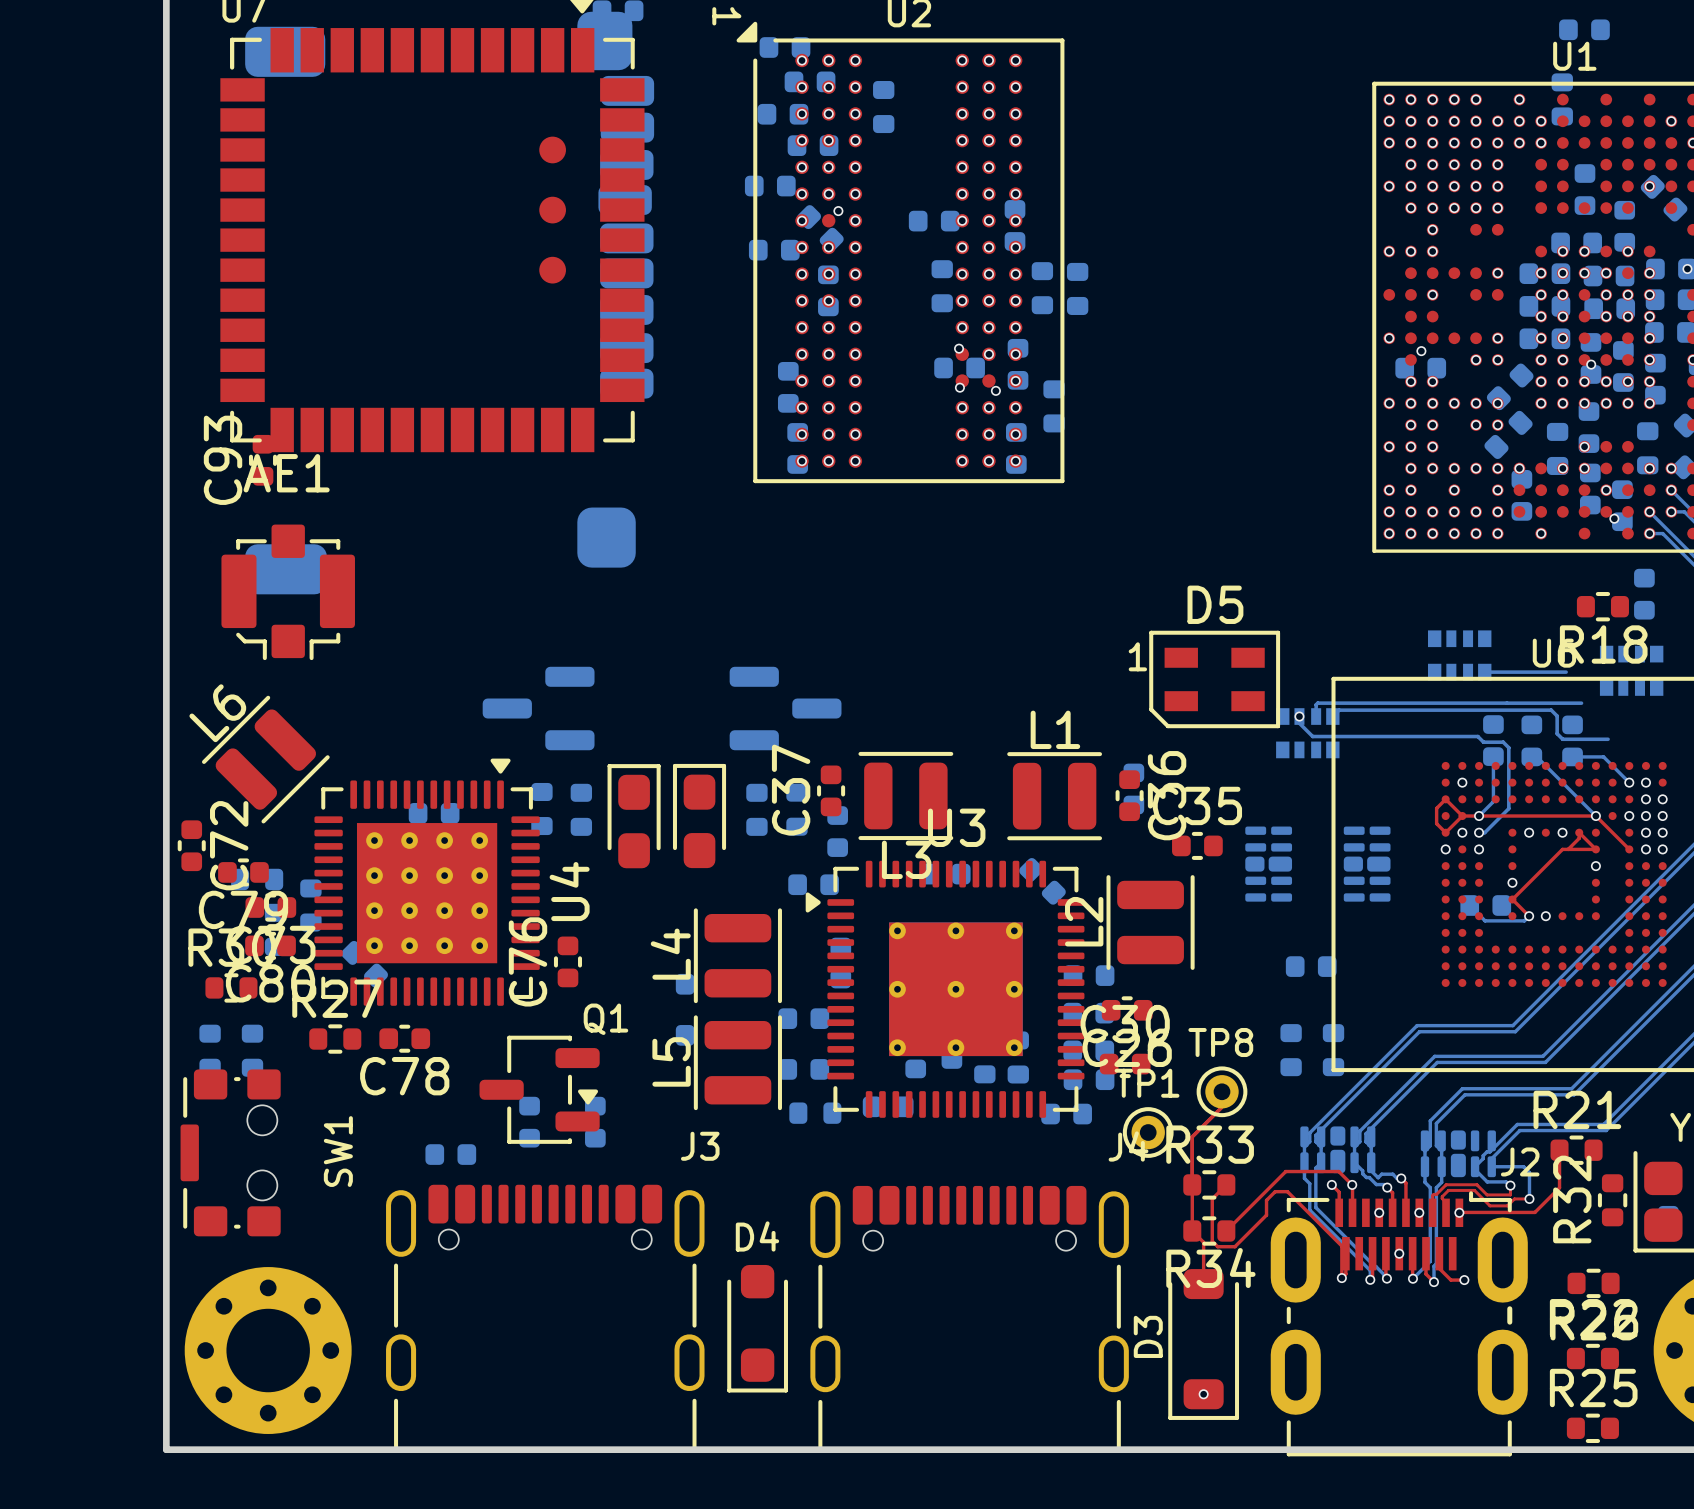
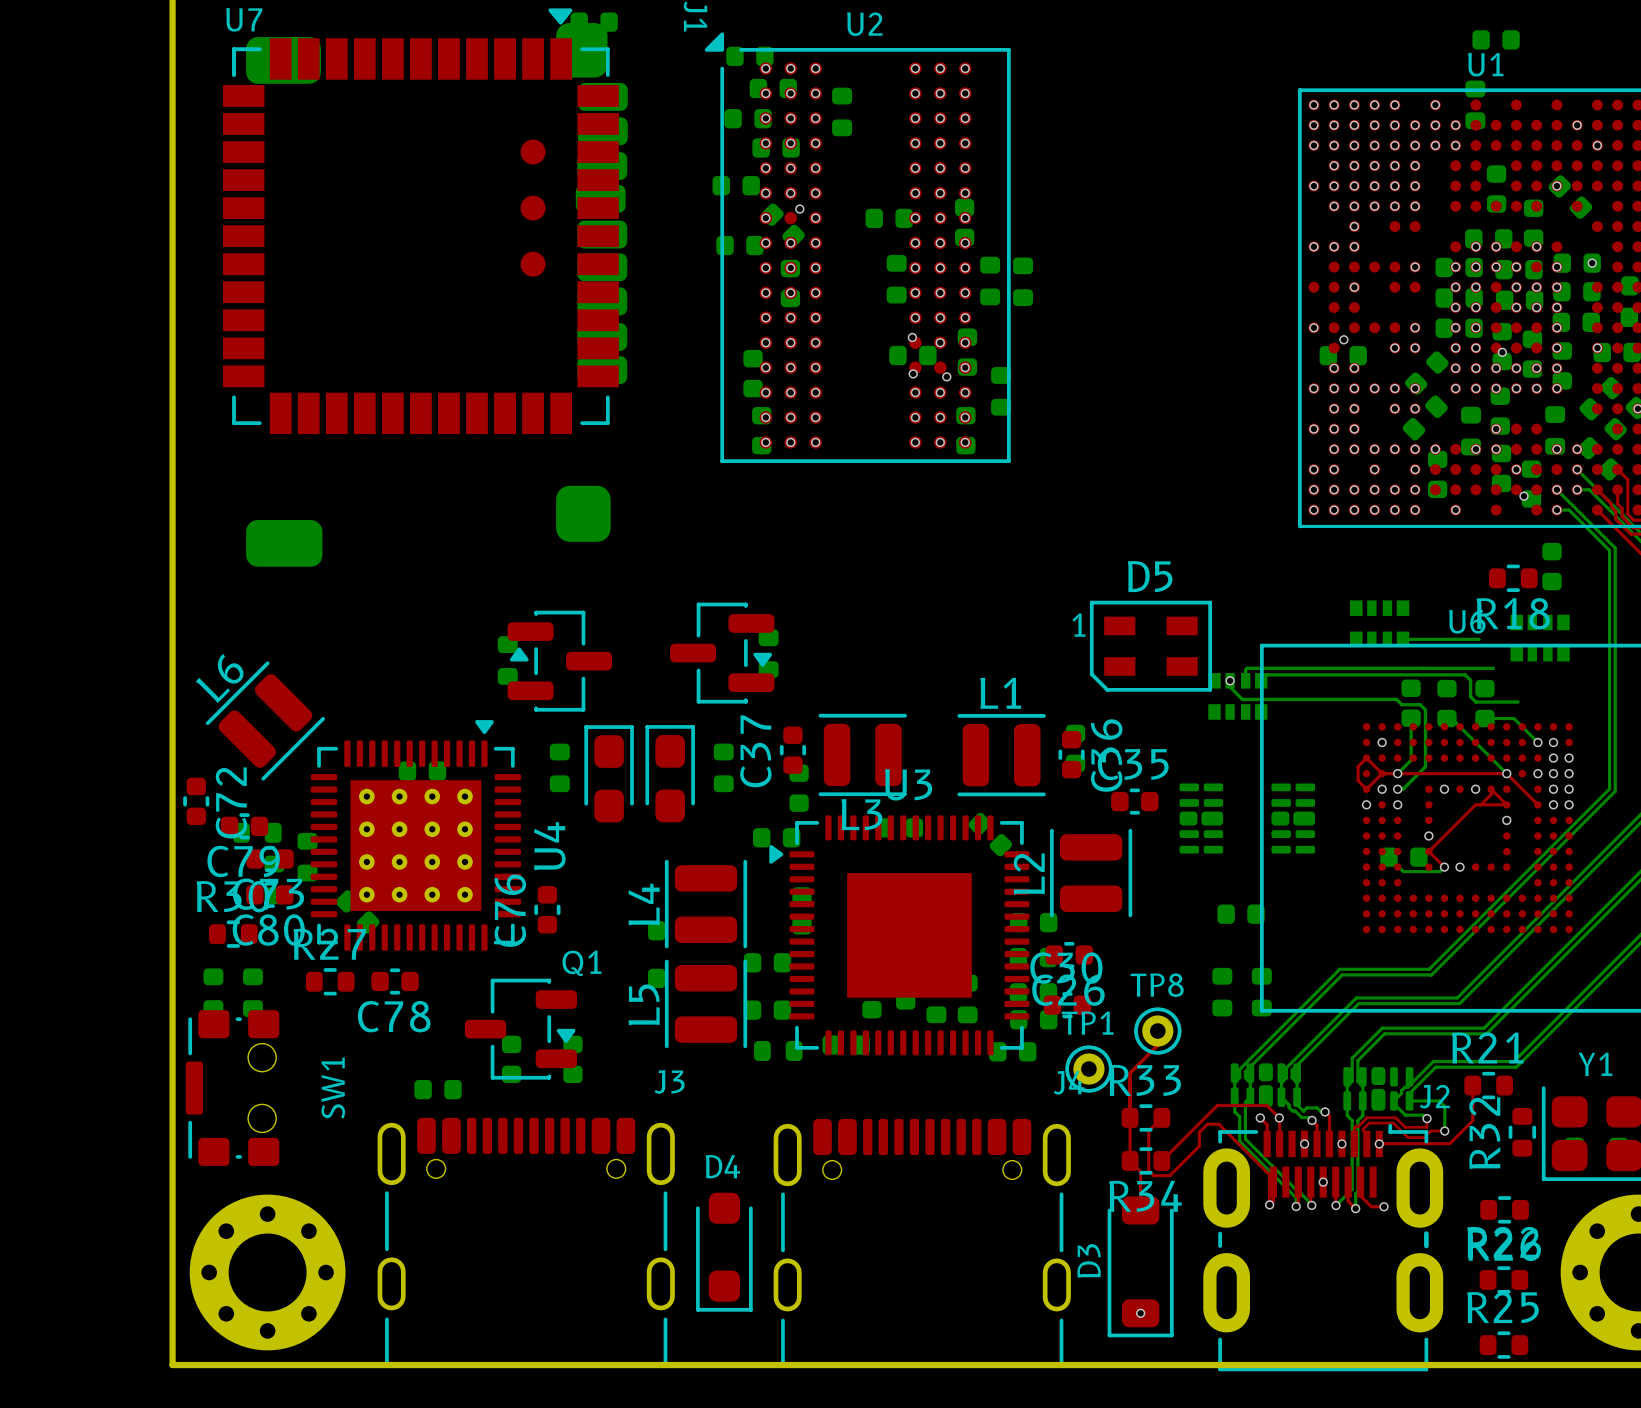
C93: (263, 460) -> none
AE1: (288, 592) -> none
part footprint: [482, 666, 595, 751] -> [497, 636, 518, 685]
part: none -> (559, 661)
part side: bottom (785, 708) -> top (722, 653)
part: (541, 809) -> none
part position: (797, 809) -> (768, 653)
U3 footprint: [805, 860, 1085, 1118] -> [769, 815, 1030, 1056]

